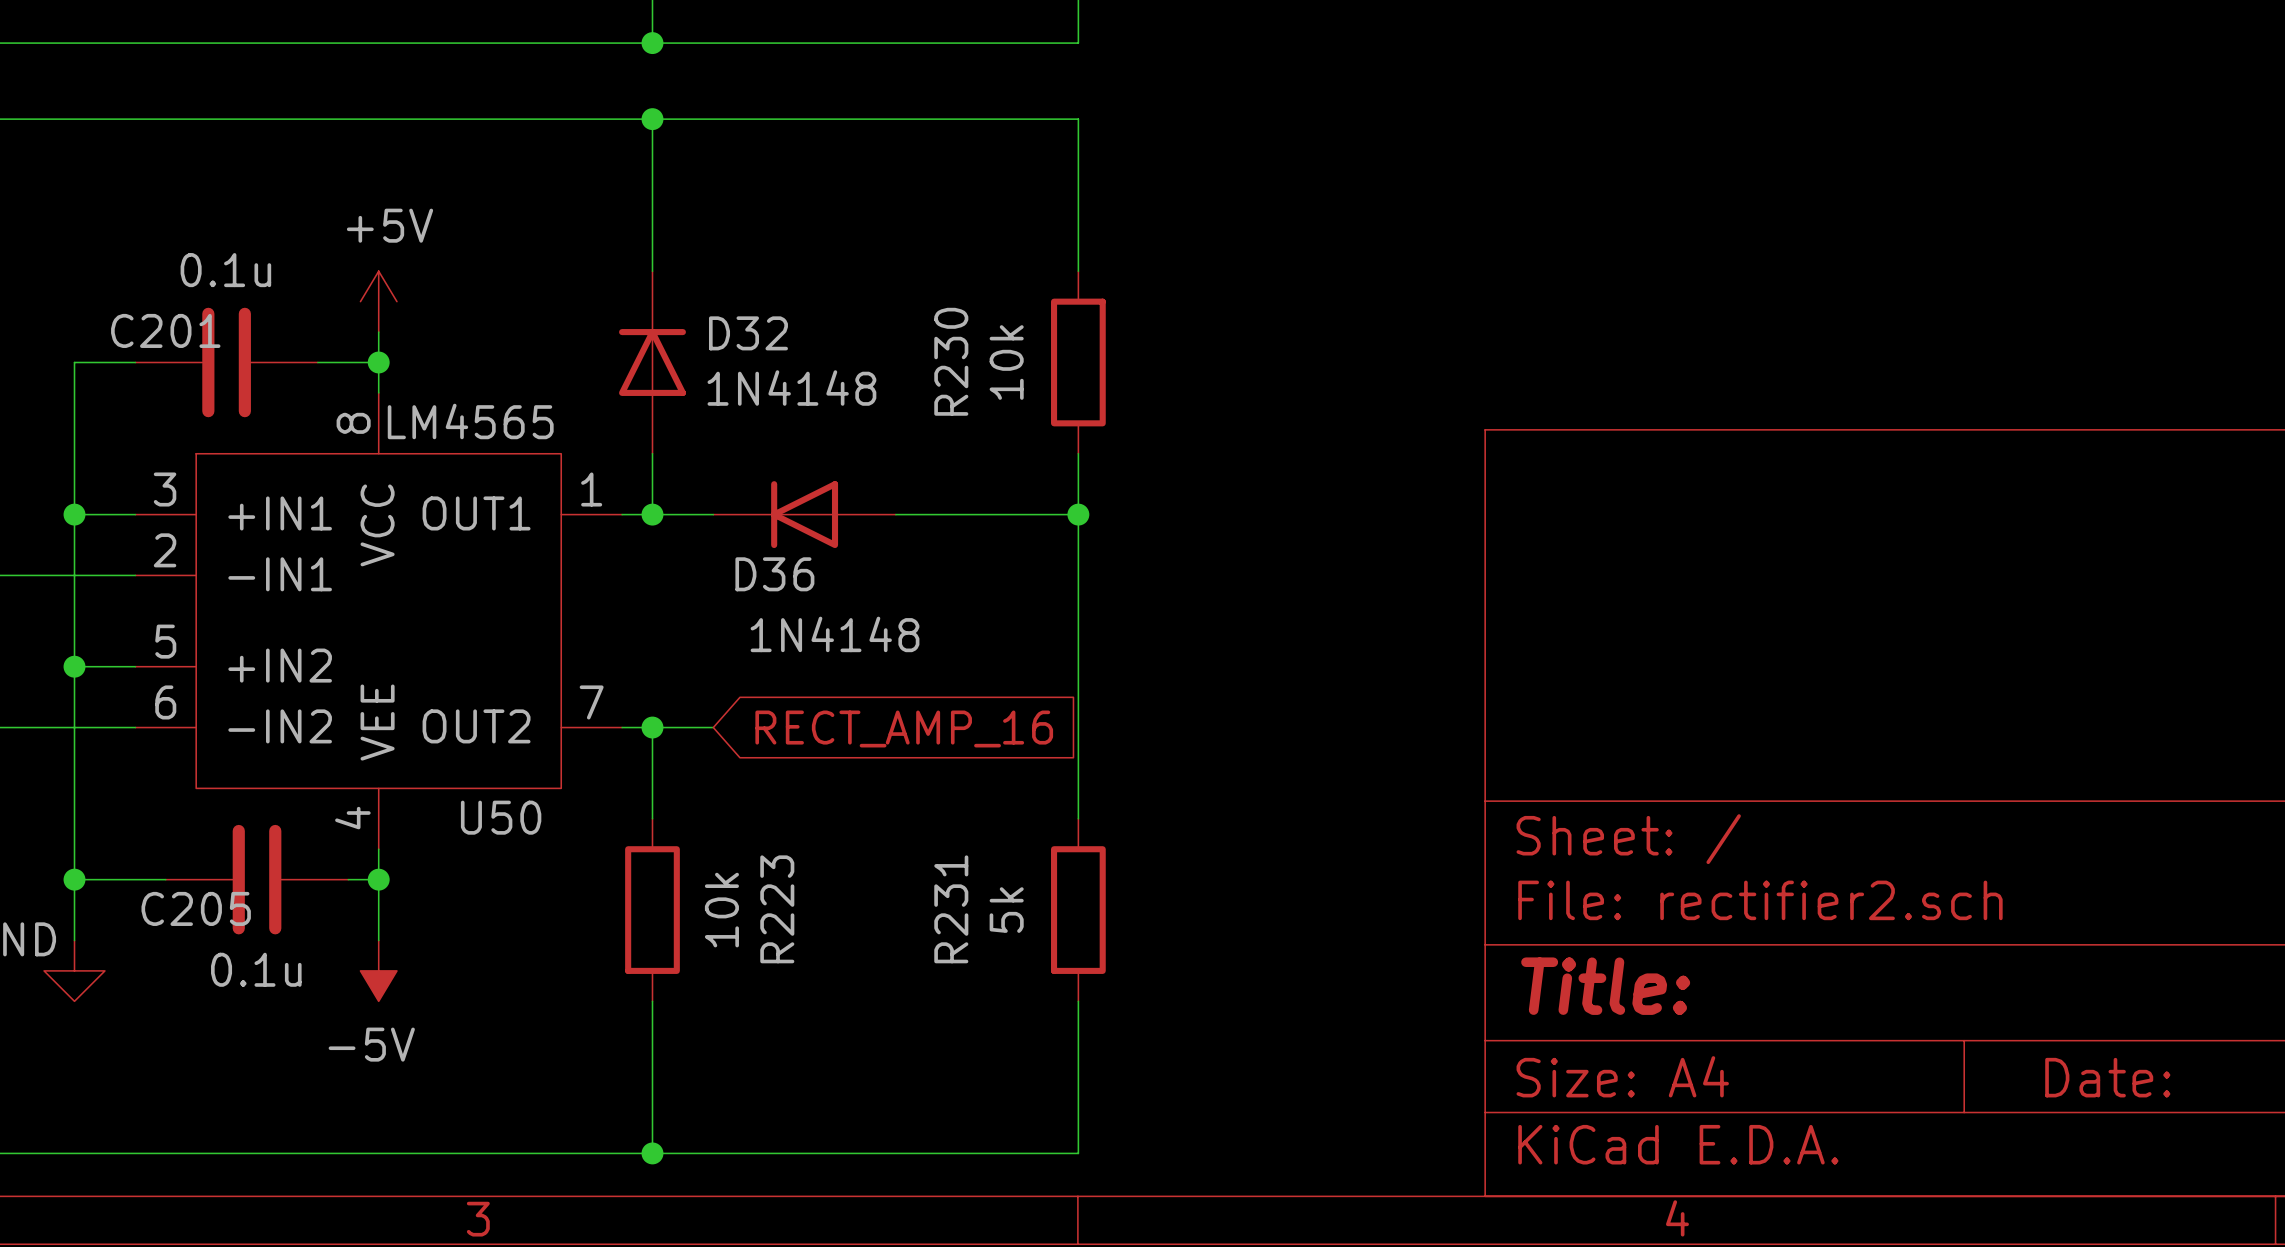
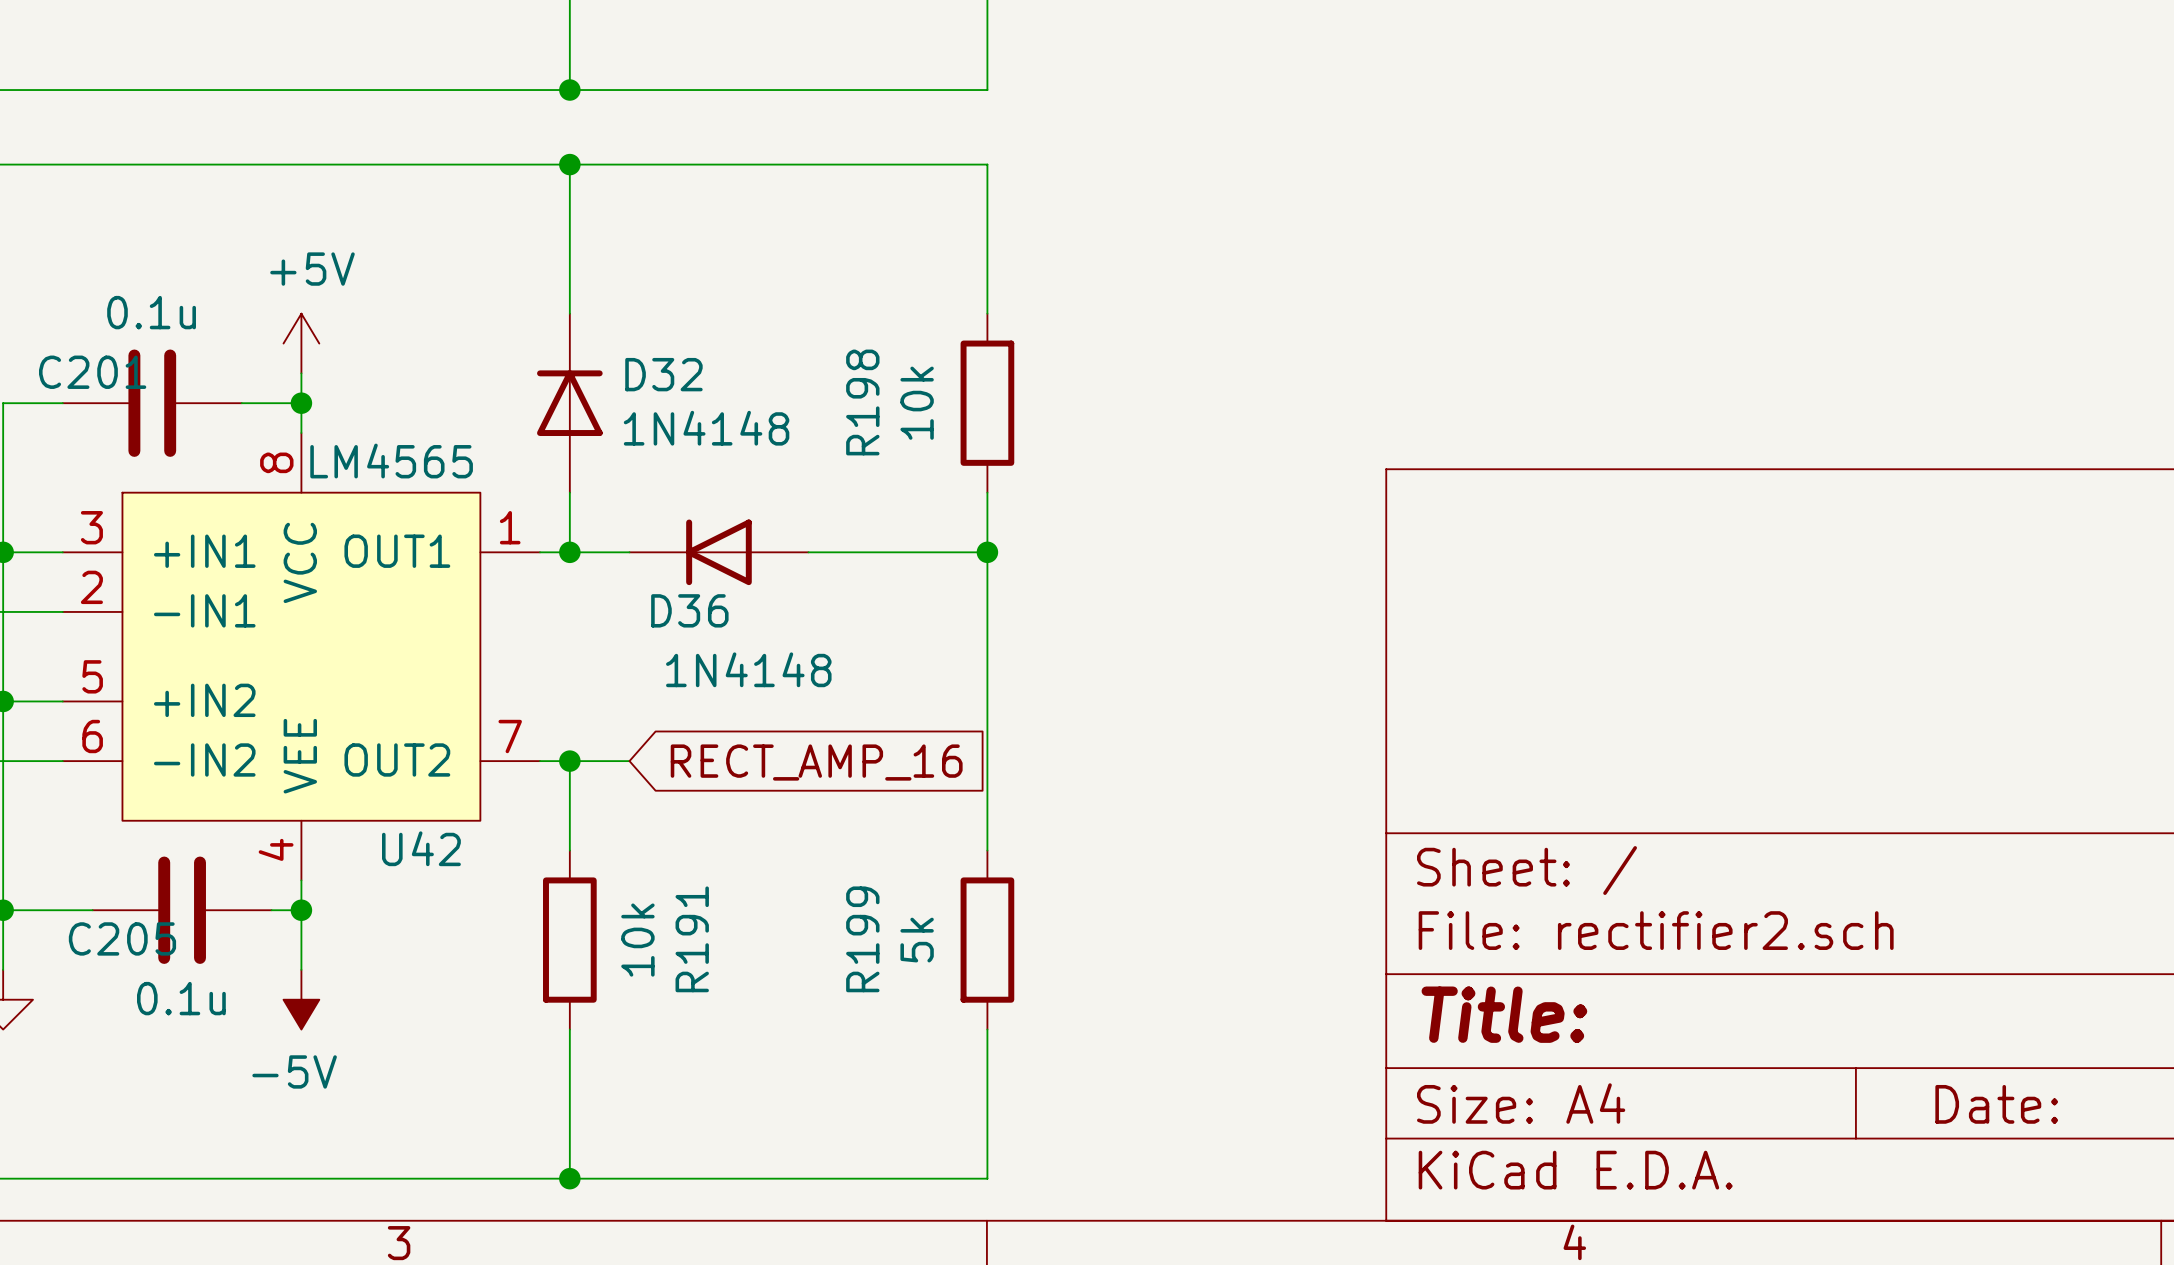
R230 name: R230 (951, 361) -> R198 (862, 402)
U50 name: U50 (501, 817) -> U42 (421, 848)
R223 name: R223 (777, 909) -> R191 (692, 939)
R231 name: R231 (951, 909) -> R199 (862, 939)

